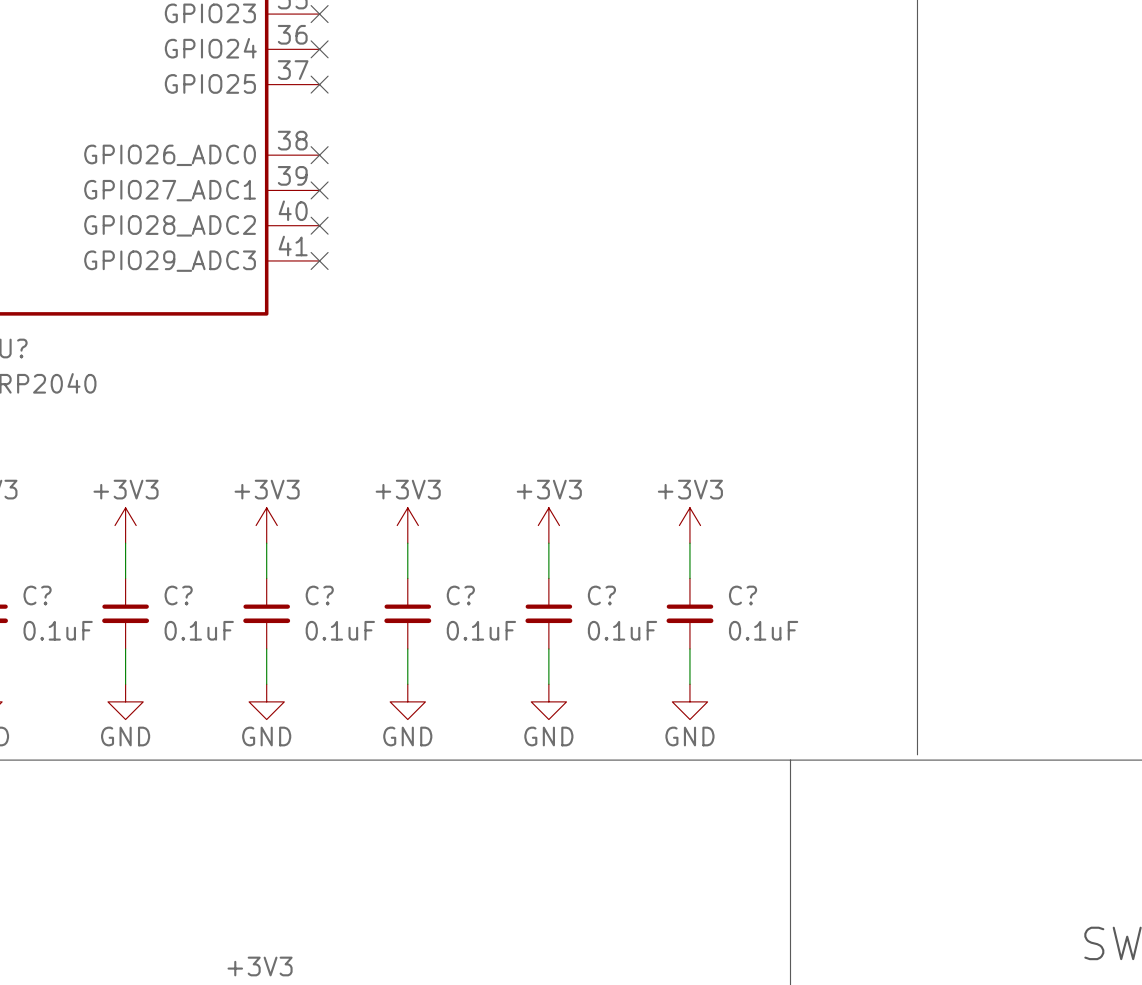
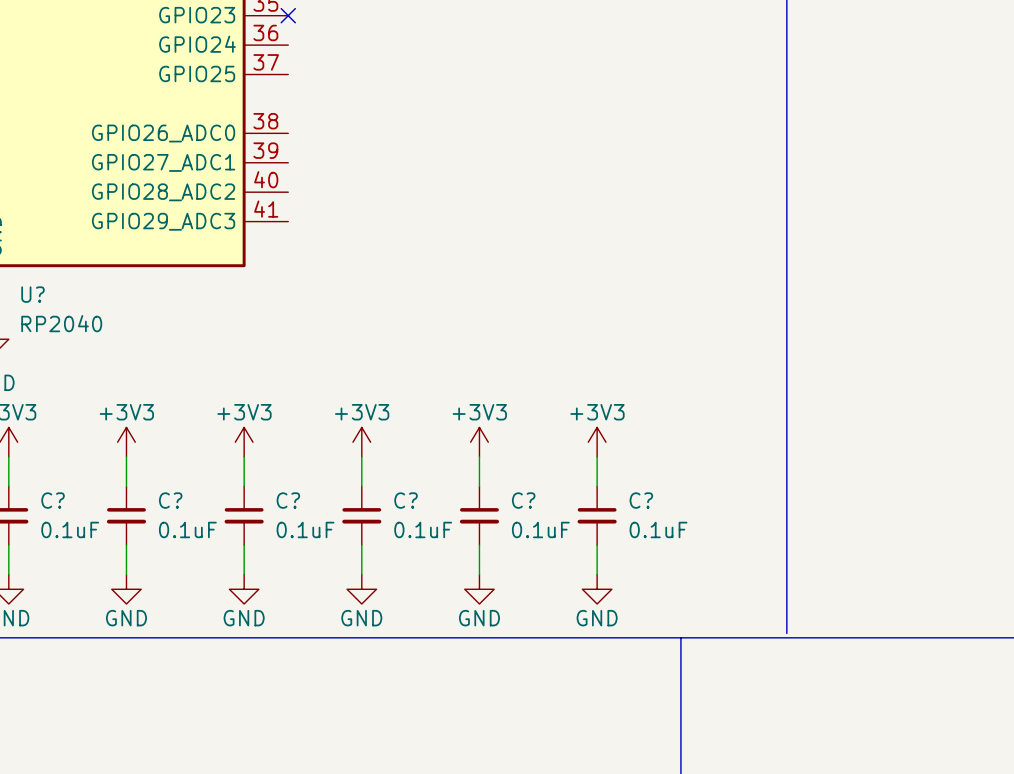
no-connect mark: (319, 49) -> none
no-connect mark: (319, 84) -> none
no-connect mark: (319, 155) -> none
no-connect mark: (319, 190) -> none
no-connect mark: (319, 225) -> none
no-connect mark: (319, 260) -> none

